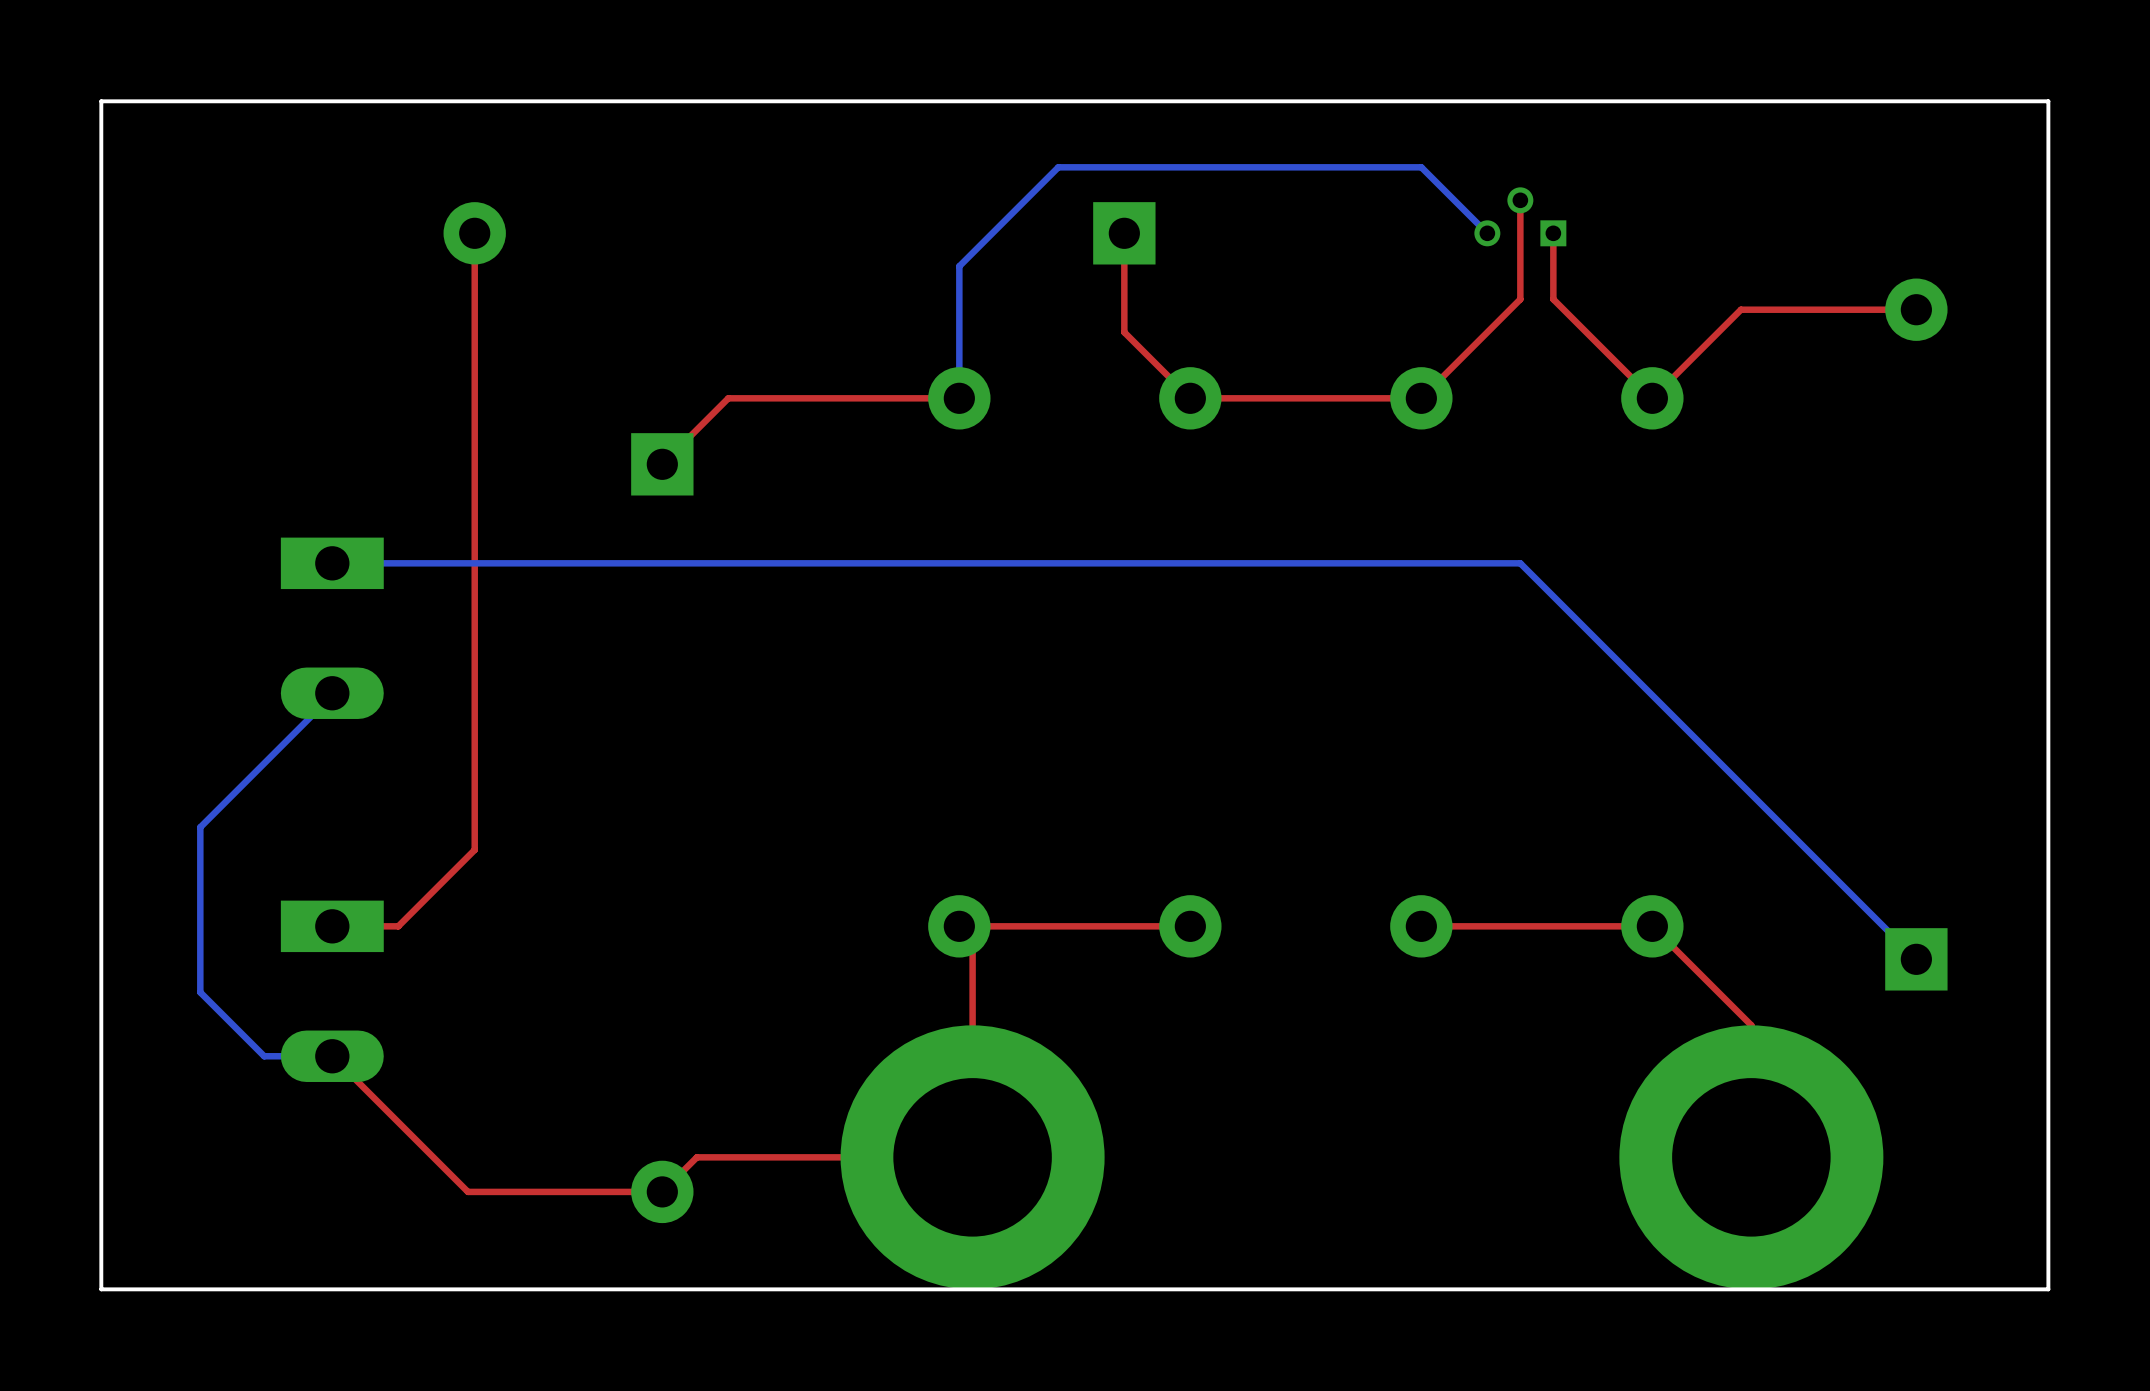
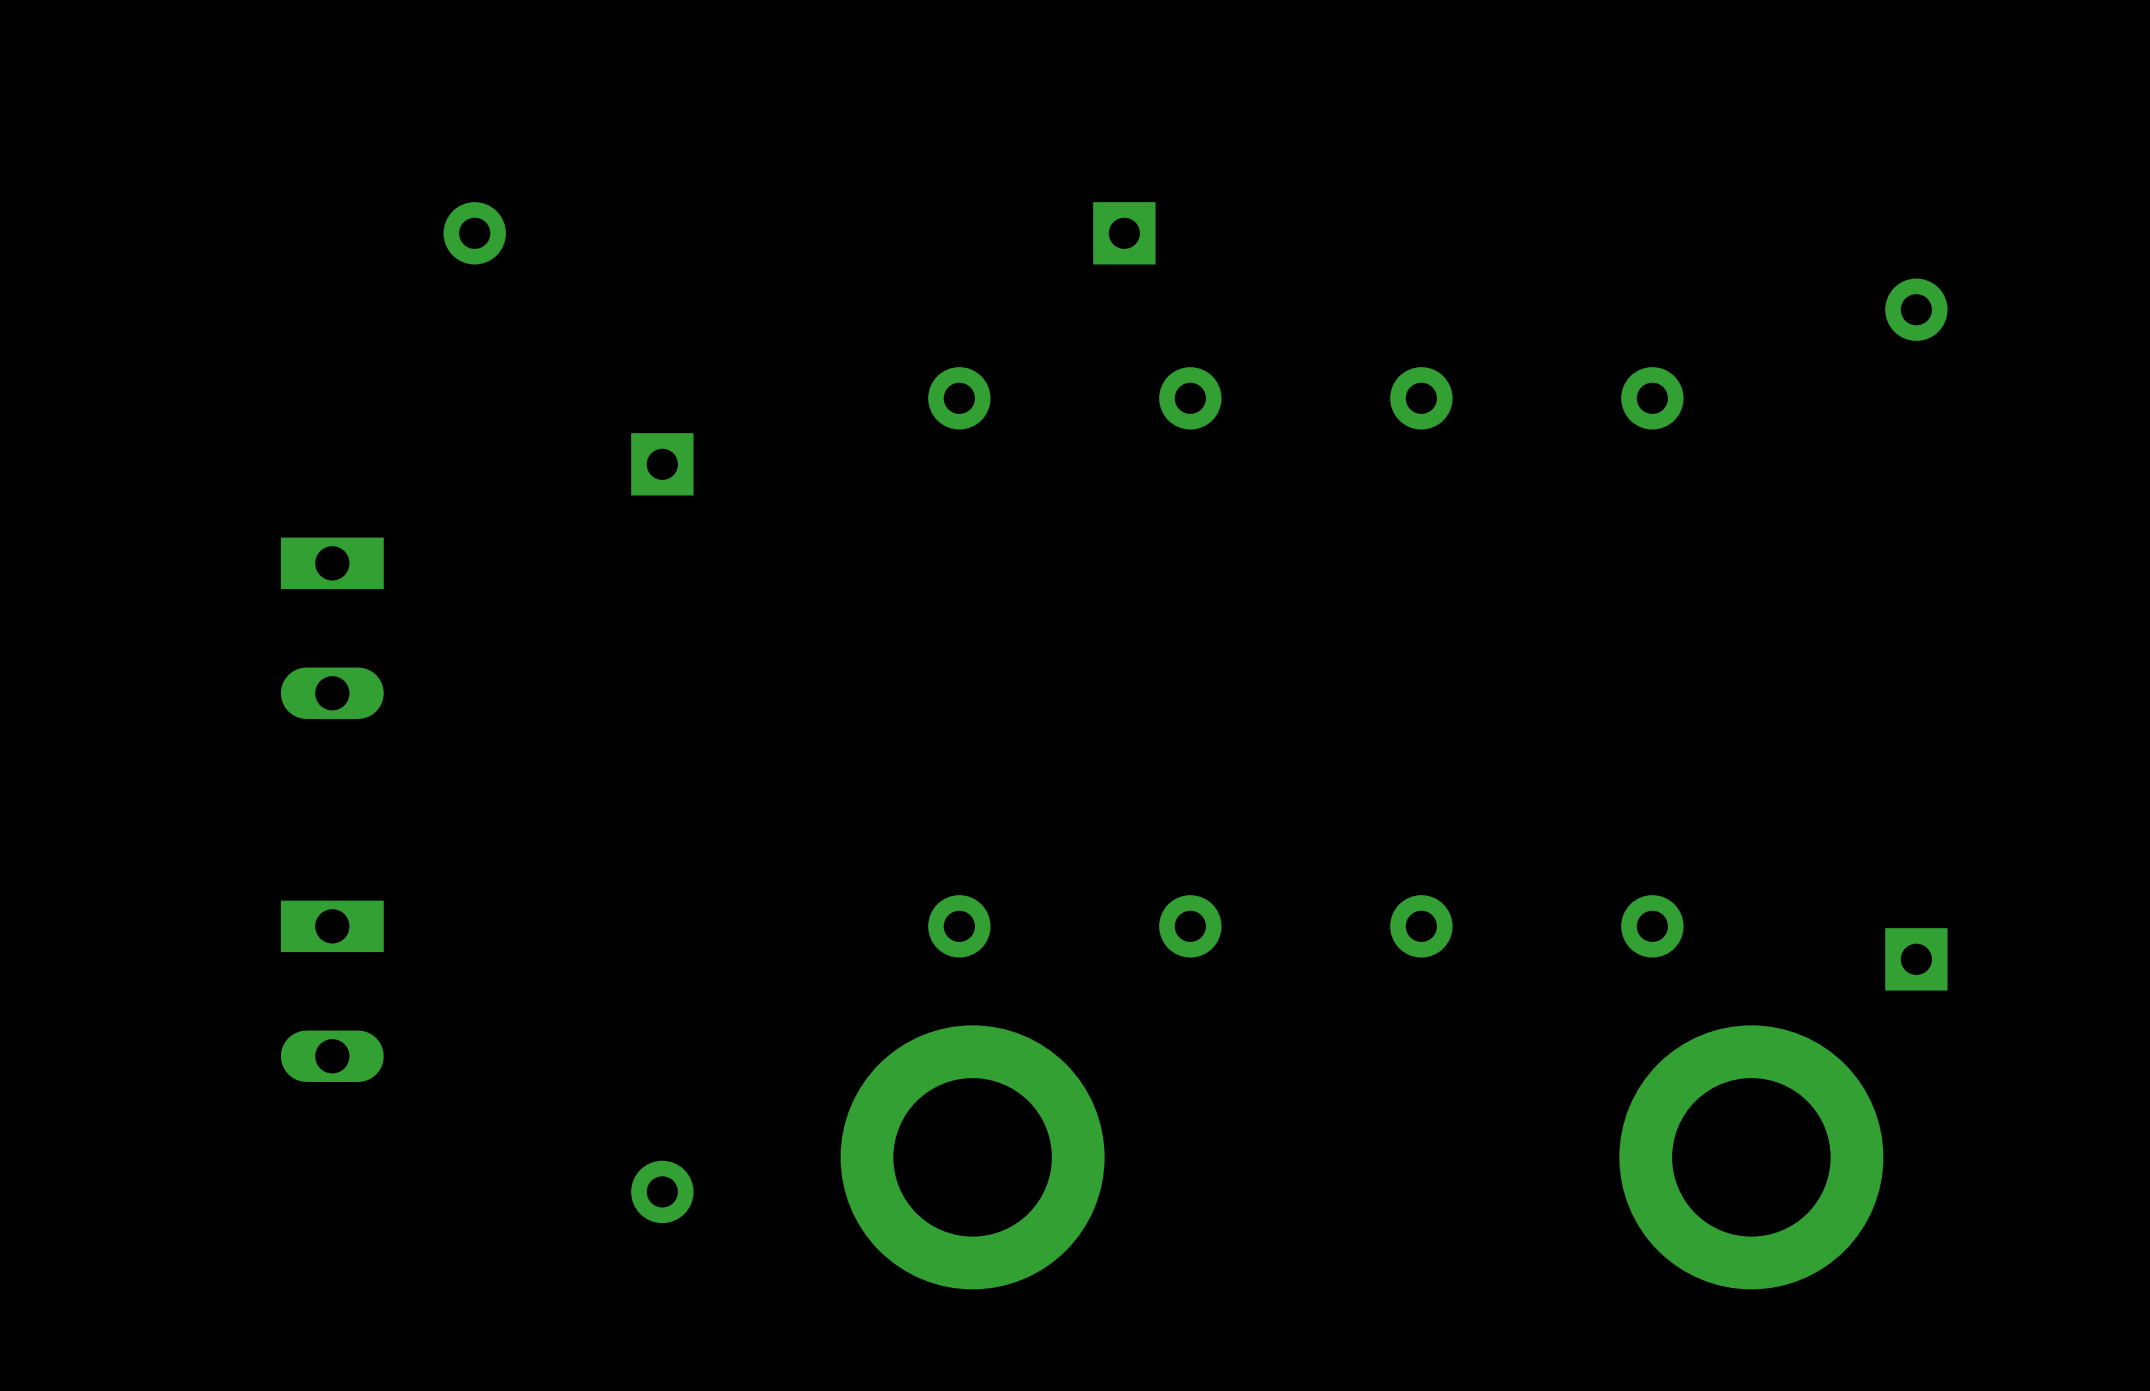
board edge: (2048, 101) (2048, 1289) (101, 1289) (101, 101) (2048, 101) -> none
top track: (1520, 200) (1520, 299) (1421, 398) (1190, 398) (1124, 332) (1124, 233) -> none
part: (1520, 216) -> none
top track: (474, 233) (474, 849) (398, 926) (332, 926) -> none
bottom track: (1487, 233) (1421, 167) (1058, 167) (959, 266) (959, 398) -> none
top track: (1553, 233) (1553, 299) (1652, 398) (1740, 309) (1916, 309) -> none
top track: (959, 398) (728, 398) (662, 464) -> none
bottom track: (332, 563) (1520, 563) (1916, 959) -> none
bottom track: (332, 693) (200, 827) (200, 992) (264, 1056) (332, 1056) -> none
top track: (1190, 926) (959, 926) (972, 939) (972, 1157) (696, 1157) (662, 1191) (467, 1191) (332, 1056) -> none
top track: (1421, 926) (1652, 926) (1751, 1025) (1751, 1157) -> none

